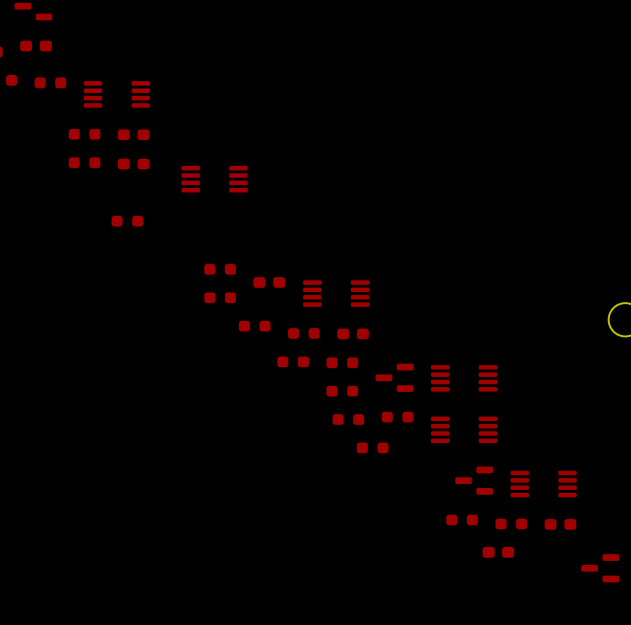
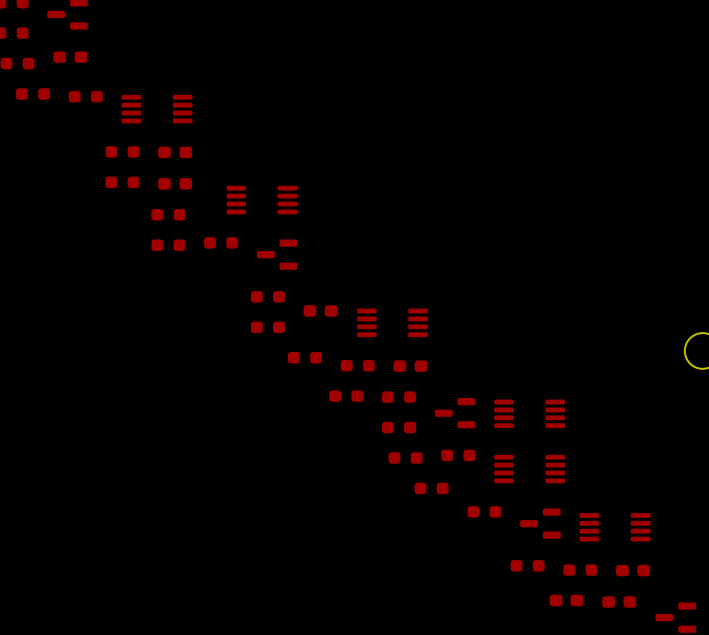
part: none -> (168, 214)
part: none -> (221, 242)
part: none -> (277, 254)
part: none -> (484, 511)
part: none -> (619, 601)

